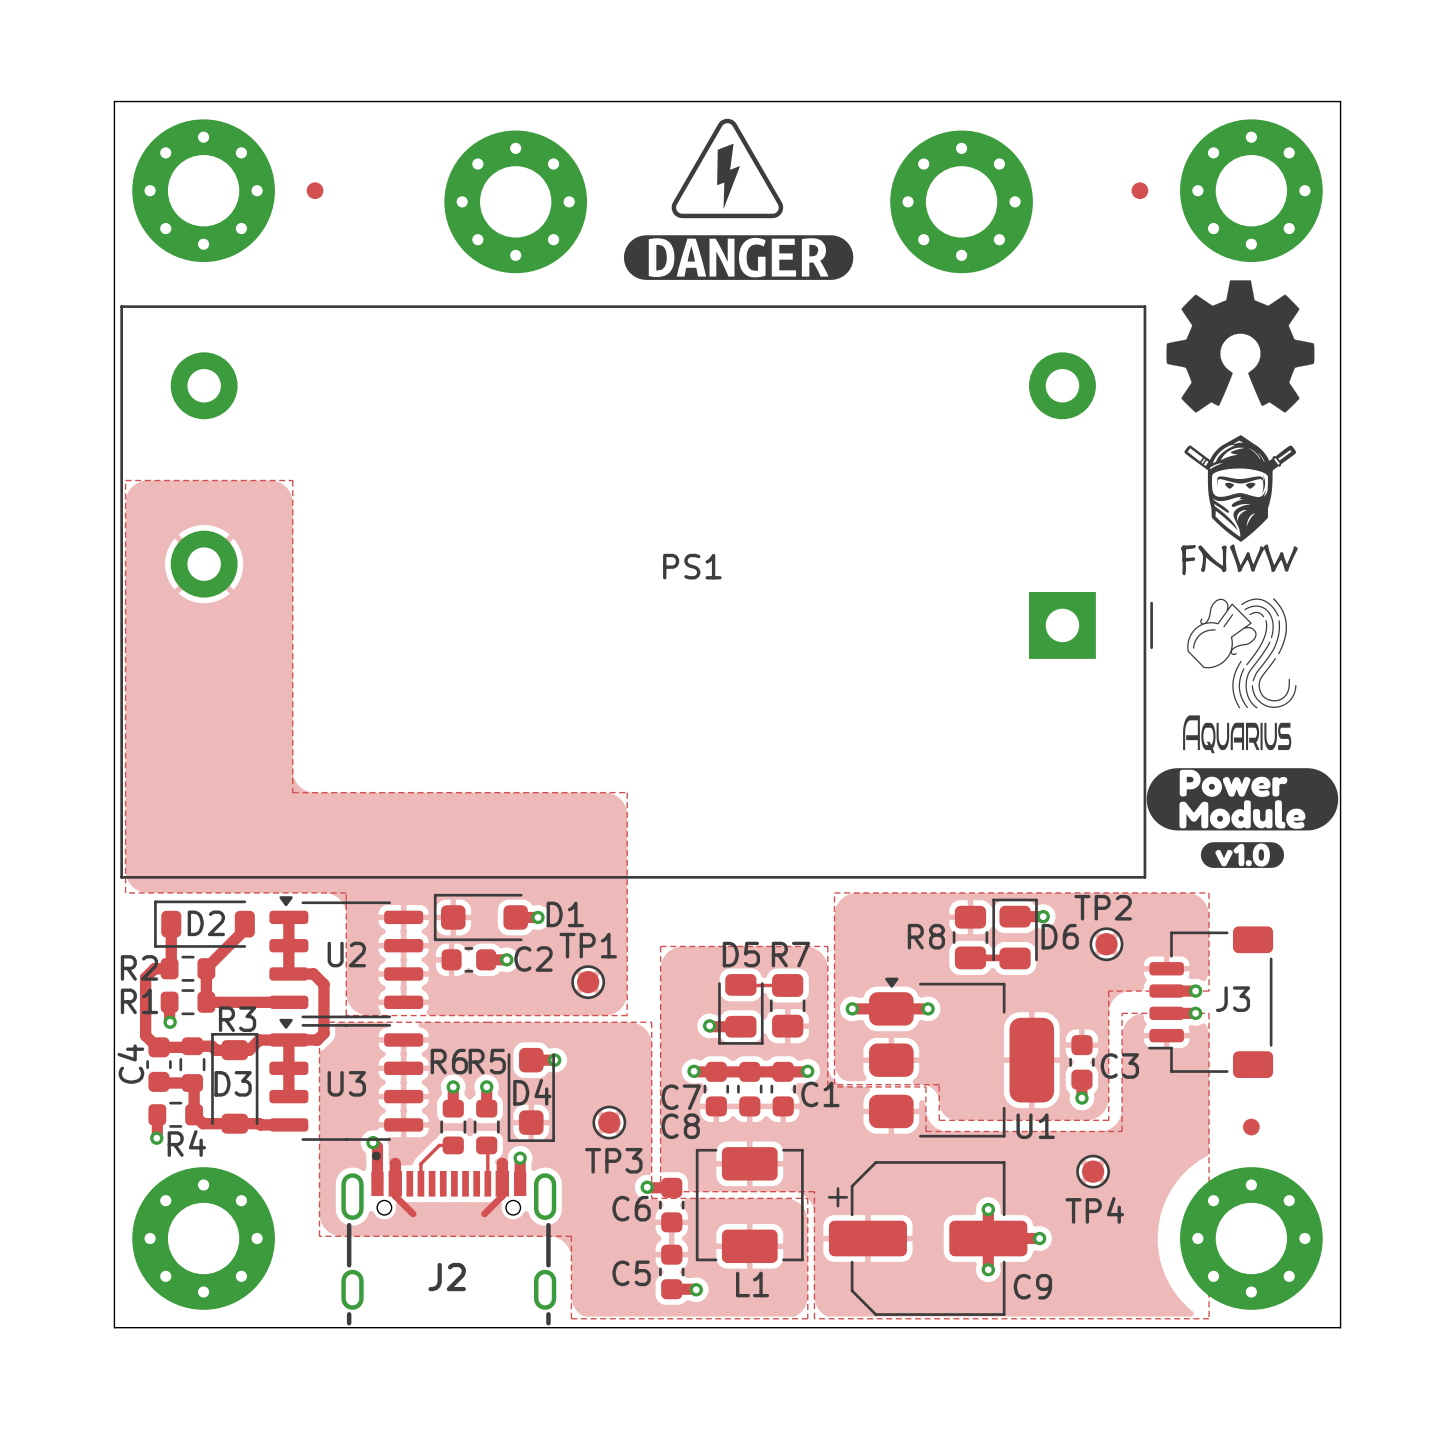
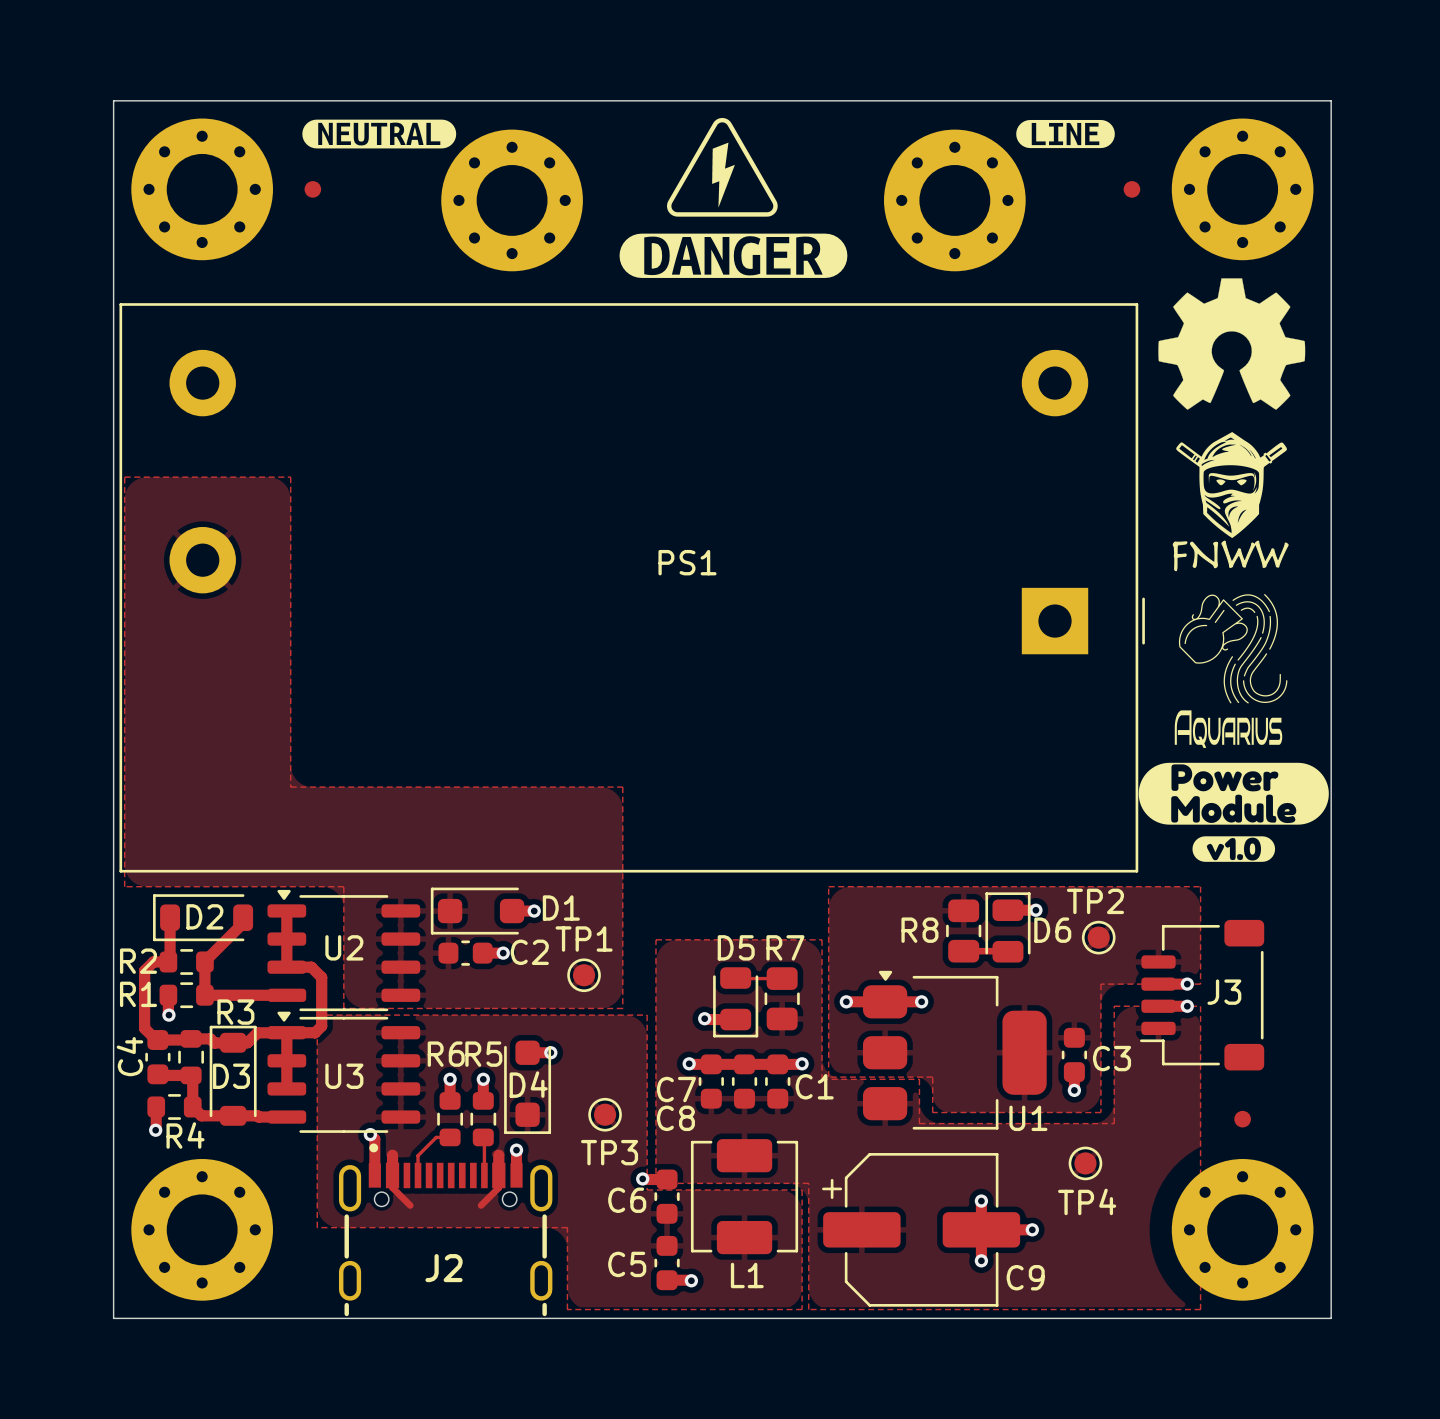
drawing: none -> [302, 119, 457, 149]
drawing: none -> [1016, 119, 1115, 149]

